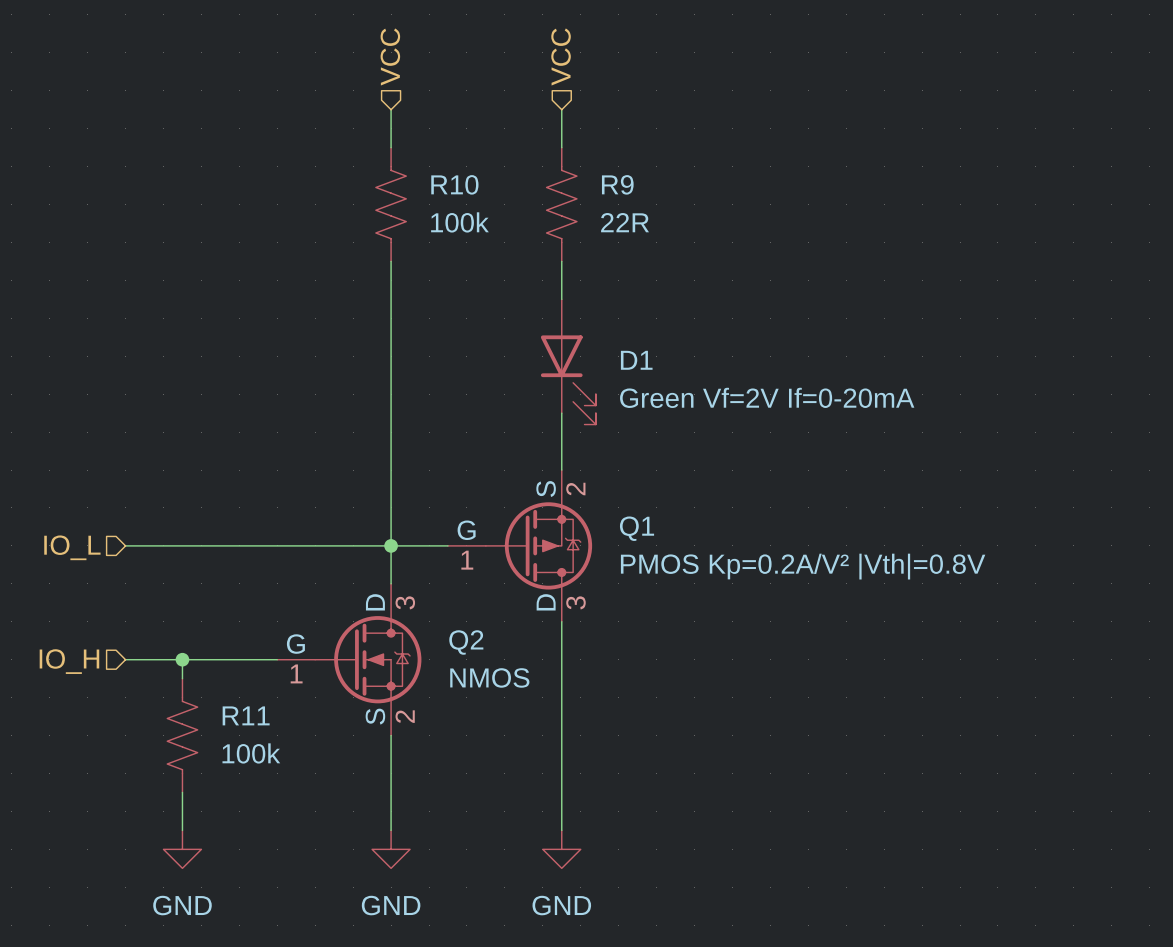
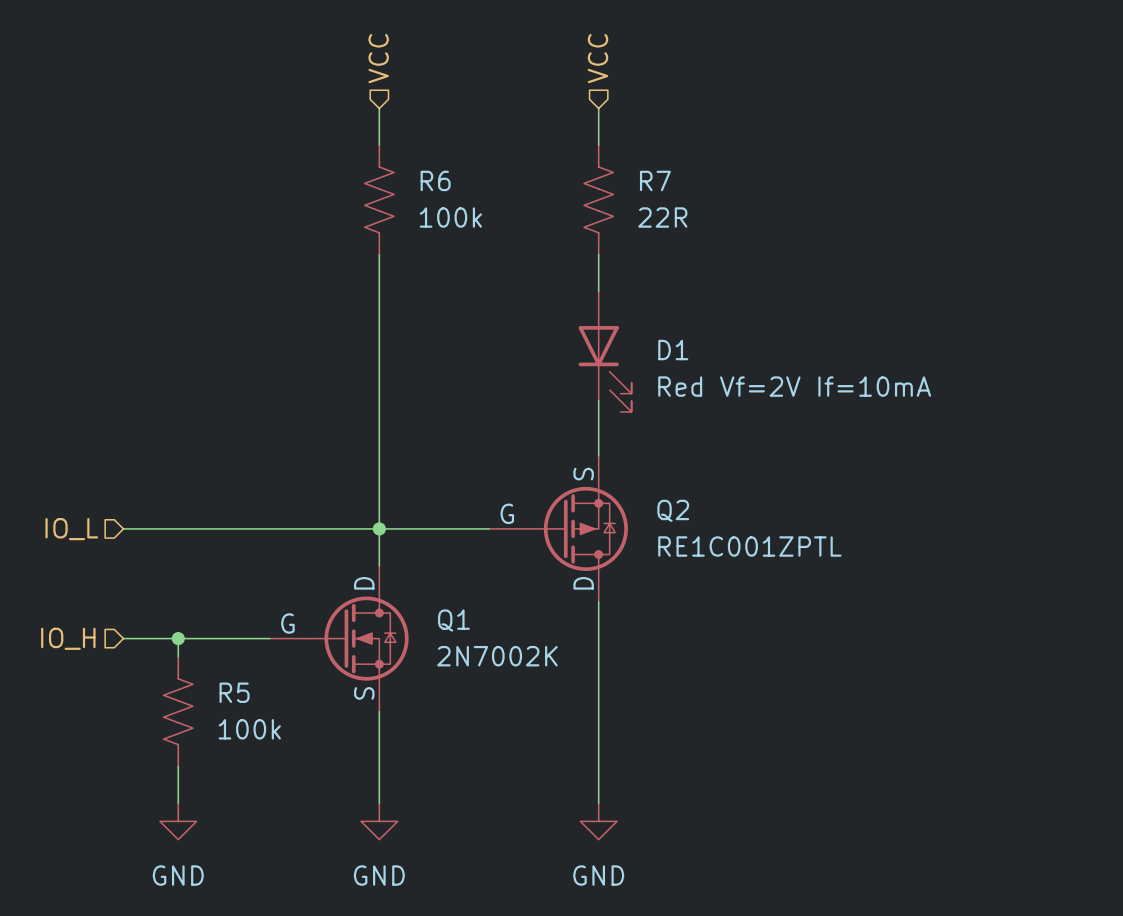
hierarchical label position: VCC (561, 56) -> VCC (598, 58)
wire: (561, 109) (561, 147) -> (598, 108) (598, 145)
R10 name: R10 (454, 184) -> R6 (435, 180)
R9: 22R (561, 204) -> none
R7: none -> 22R (598, 199)
wire: (561, 261) (561, 299) -> (598, 254) (598, 291)
D1 position: (568, 361) -> (605, 351)
D1 value: Green Vf=2V If=0-20mA (767, 397) -> Red Vf=2V If=10mA (794, 386)
wire: (561, 413) (561, 470) -> (598, 400) (598, 455)
Q1 symbol: [447, 470, 593, 622] -> [269, 565, 409, 712]
Q1 value: PMOS Kp=0.2A/V² |Vth|=0.8V (803, 566) -> 2N7002K (497, 656)
Q2 symbol: [277, 583, 422, 736] -> [489, 455, 628, 603]
wire: (561, 621) (561, 830) -> (598, 602) (598, 803)
Q2 value: NMOS (489, 677) -> RE1C001ZPTL (749, 546)
R11 name: R11 (246, 715) -> R5 (234, 692)
power symbol position: GND (561, 849) -> GND (598, 821)

